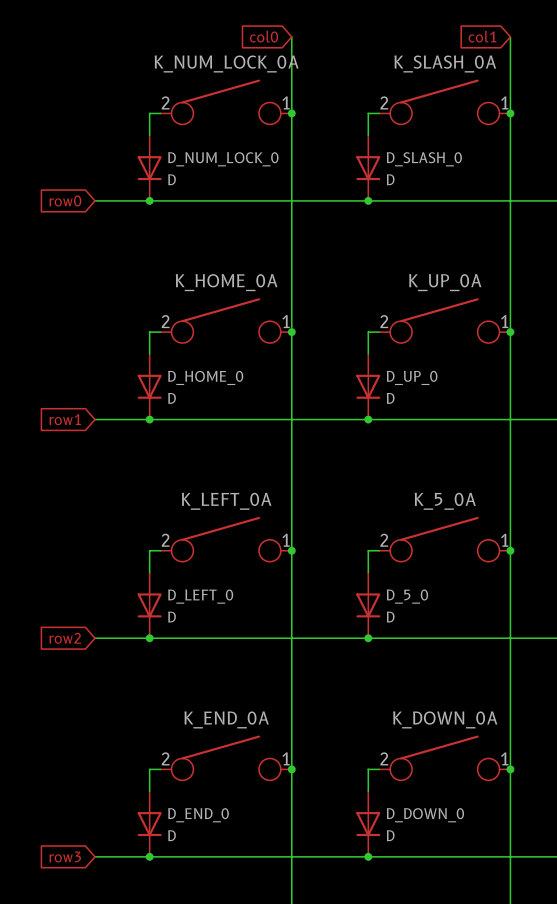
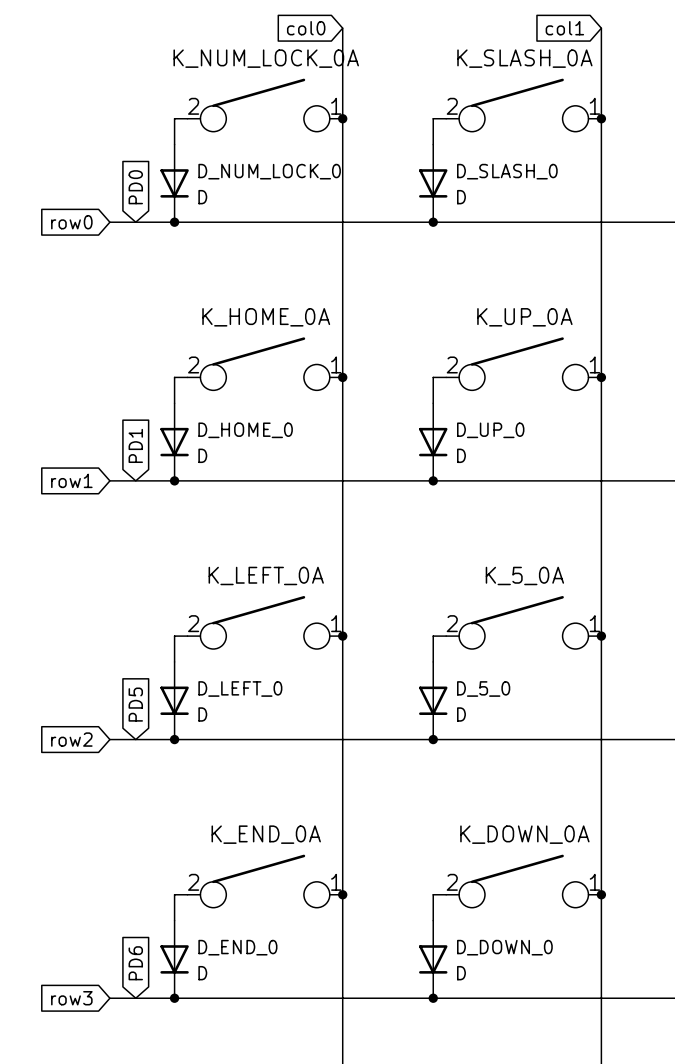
global label: none -> PD0 (135, 187)
global label: none -> PD1 (135, 445)
global label: none -> PD5 (135, 704)
global label: none -> PD6 (135, 963)

